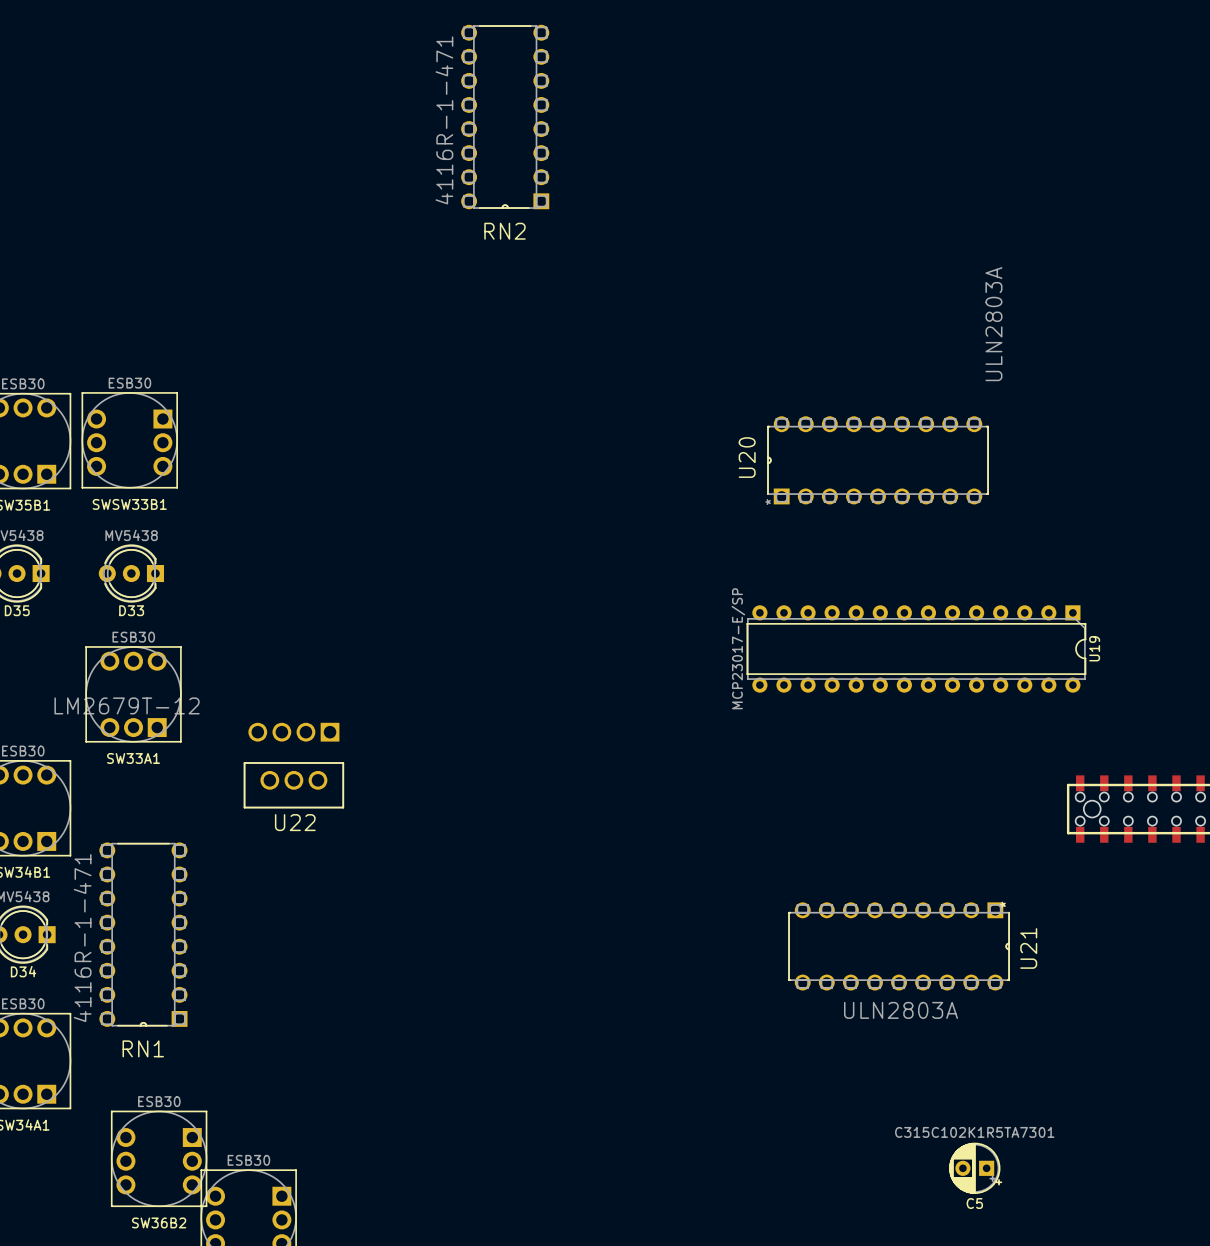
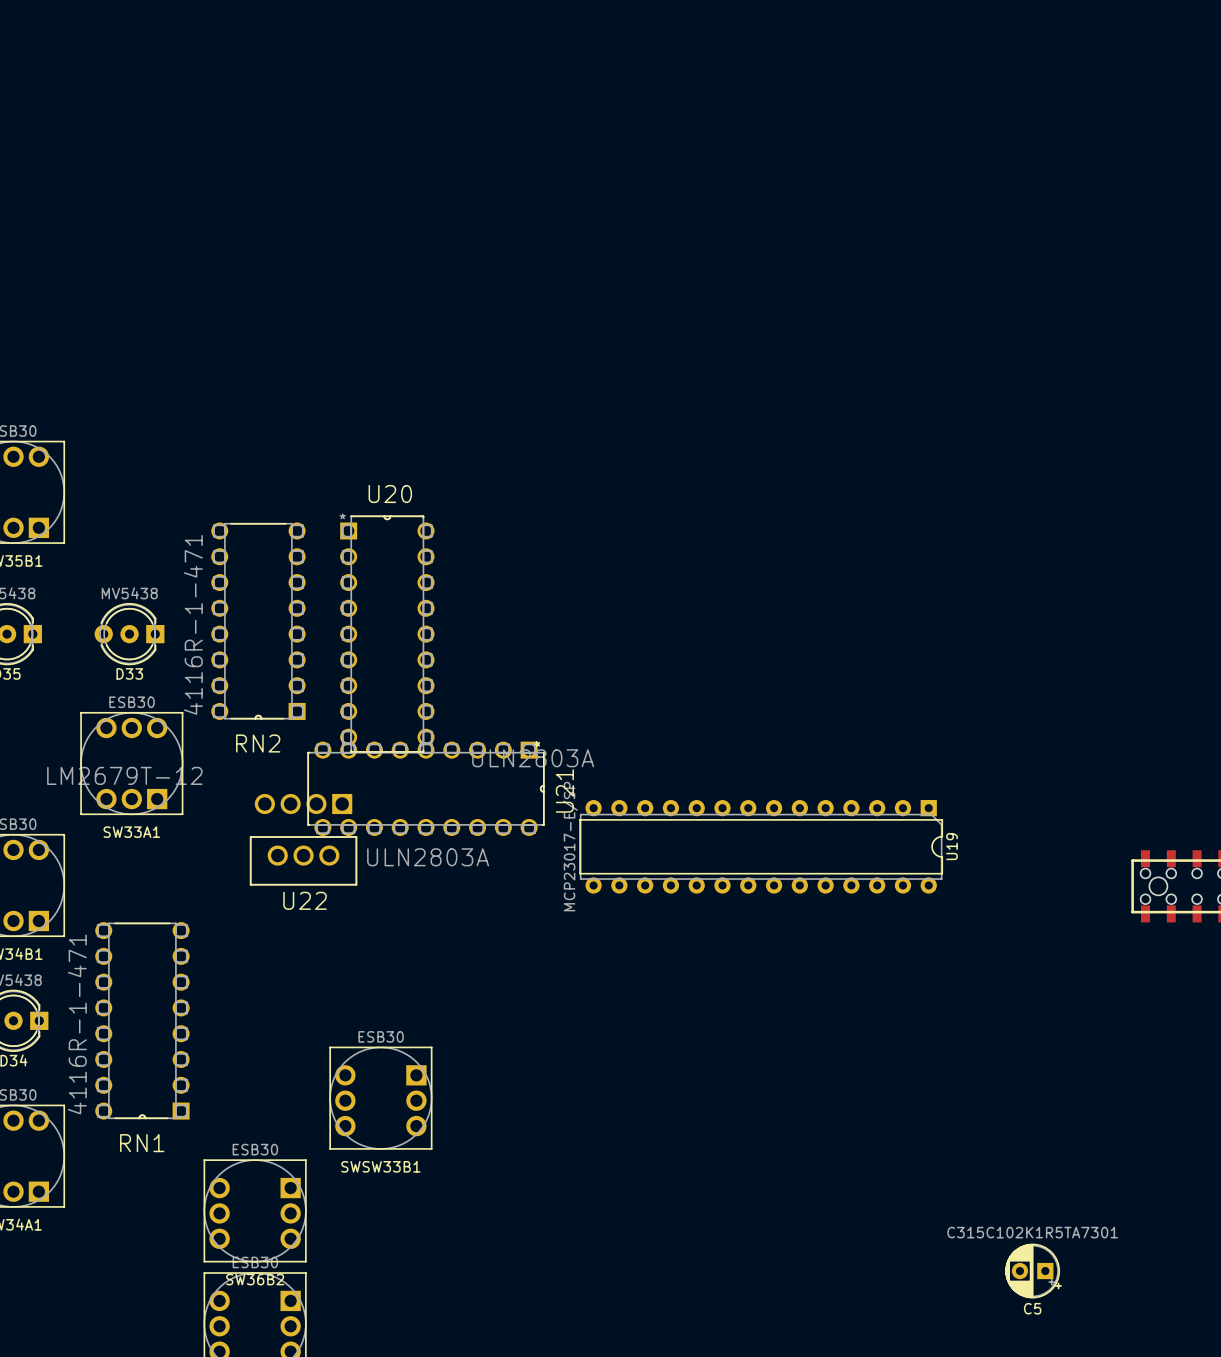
RN2 position: (505, 117) -> (258, 621)
SWSW33B1 position: (129, 440) -> (380, 1098)
U20 rotation: 0° (878, 460) -> 90° clockwise (387, 634)
U20 position: (878, 460) -> (387, 634)
U19 position: (916, 648) -> (761, 846)
U21 position: (899, 946) -> (426, 788)
SW36B2 position: (159, 1158) -> (255, 1210)

